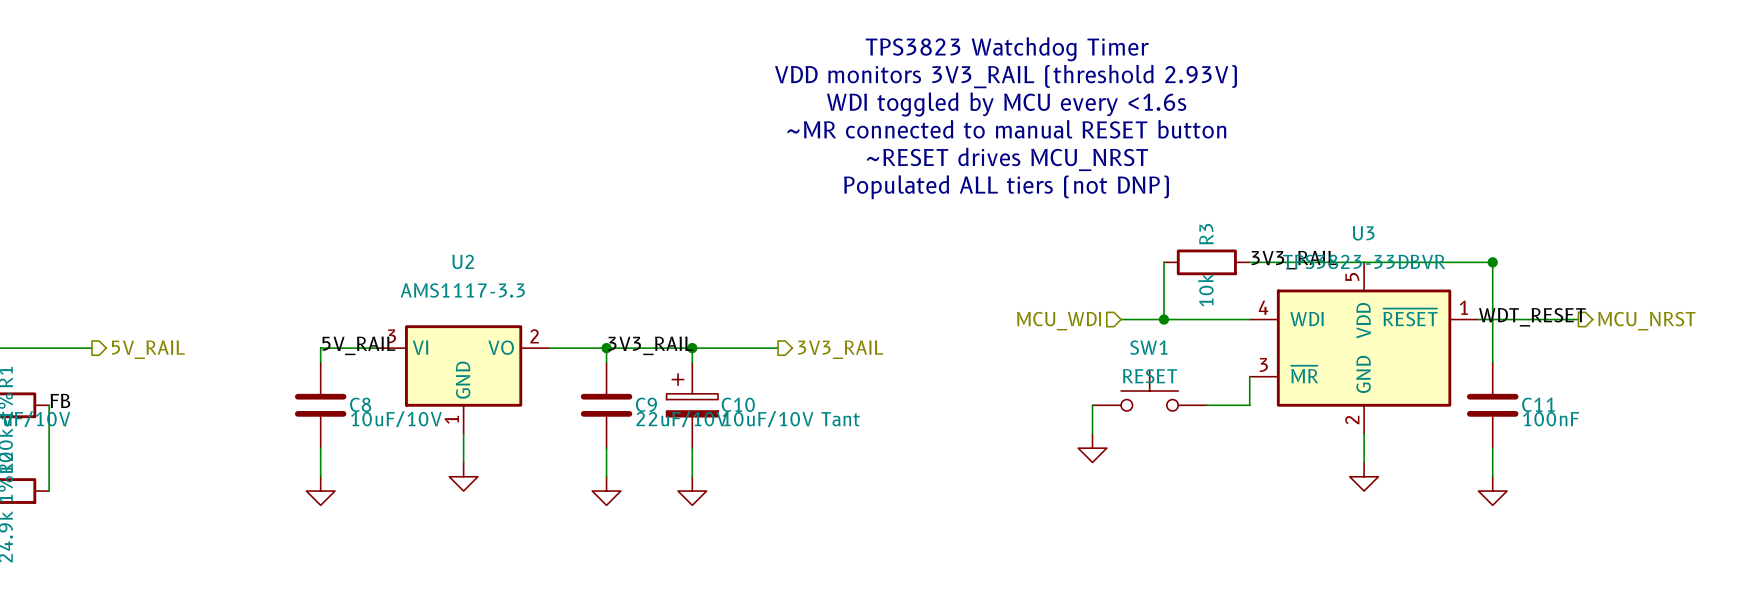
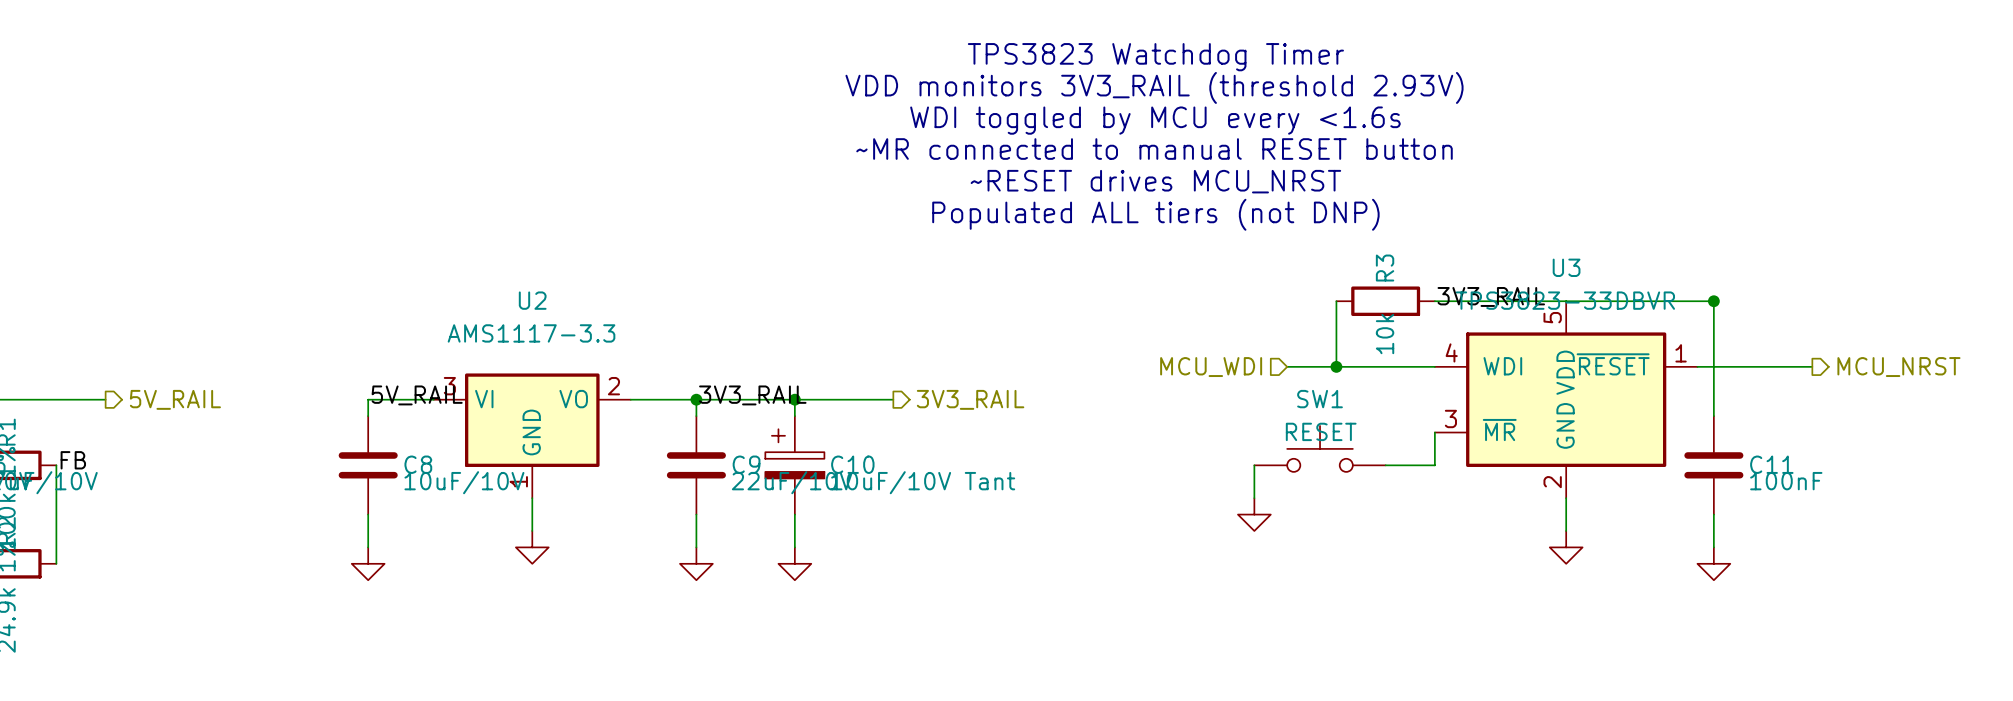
label: WDT_RESET (1532, 317) -> none

